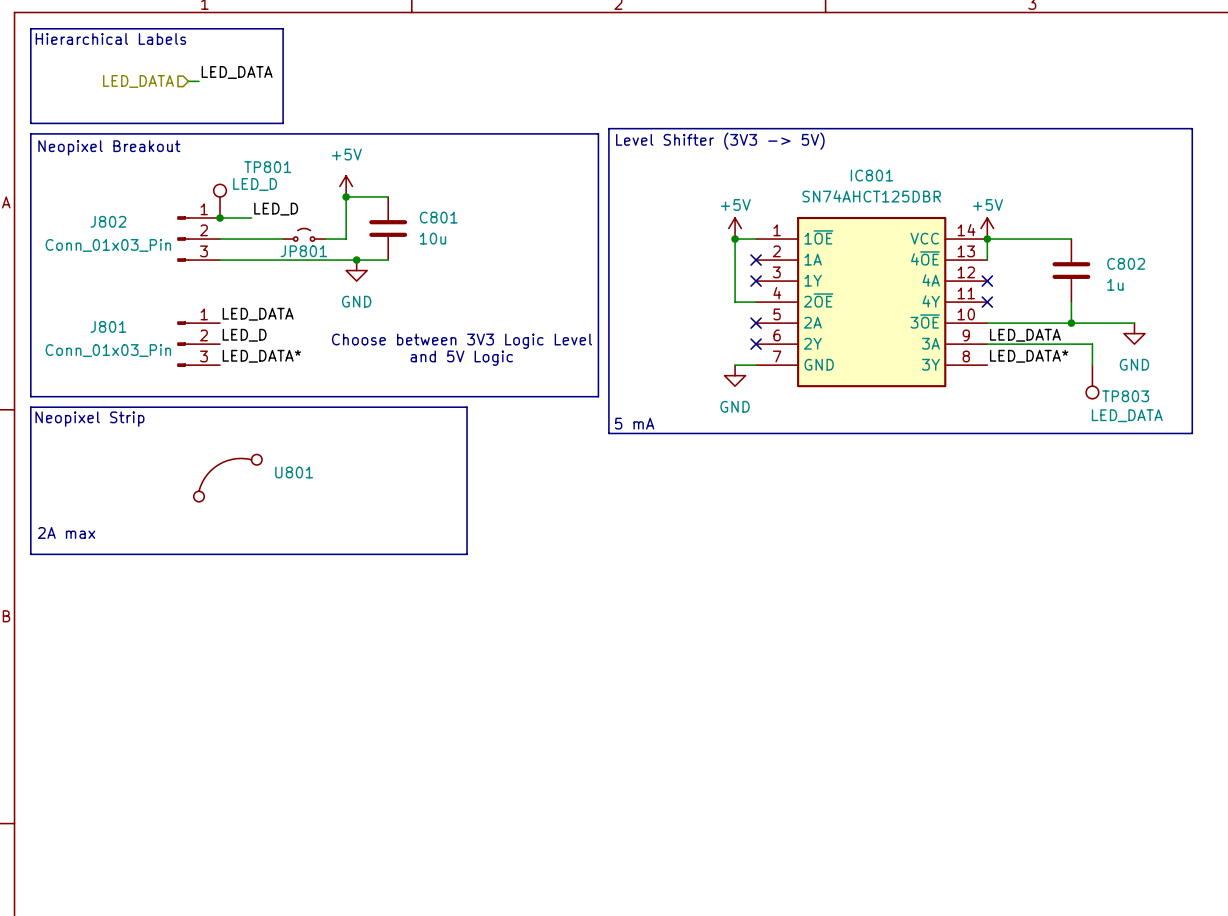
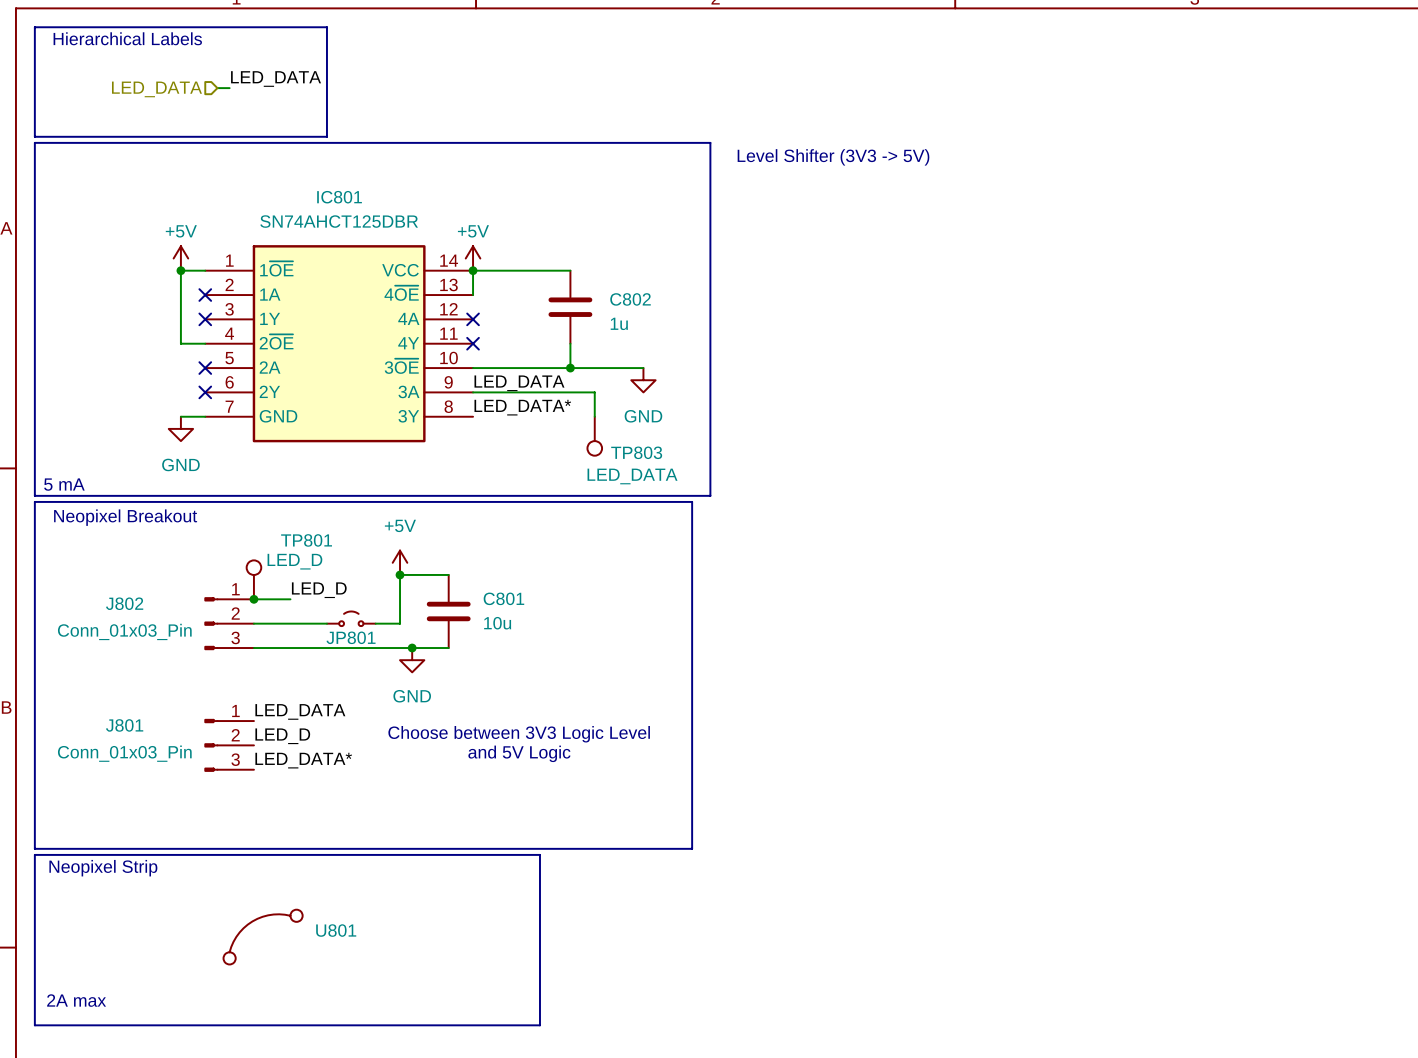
line: (608, 128) (608, 433) -> (704, 142) (34, 142) (34, 148)
line: (614, 128) (1192, 128) (1192, 433) (614, 433) -> (710, 142) (710, 495)
line: (30, 133) (598, 133) (598, 396) (30, 396) -> (34, 465) (34, 453)
text: Neopixel Breakout (109, 147) -> none
power symbol text position: +5V (346, 154) -> +5V (473, 231)
power symbol position: +5V (346, 186) -> +5V (473, 258)
junction: (346, 196) -> none
wire: (388, 196) (346, 196) (346, 239) (325, 239) -> none
TP801 position: (220, 201) -> (253, 579)
label: LED_D (276, 209) -> none
junction: (220, 218) -> none
power symbol: none -> +5V (180, 258)
C801 position: (388, 228) -> (448, 611)
power symbol: +5V (735, 228) -> none
power symbol: +5V (987, 228) -> none
JP801 position: (304, 234) -> (351, 618)
junction: none -> (180, 270)
wire: none -> (205, 270) (180, 270) (180, 343) (205, 343)
J802 position: (198, 239) -> (229, 623)
junction: none -> (473, 270)
wire: none -> (570, 270) (473, 270) (473, 295)
junction: (735, 239) -> none
wire: (756, 239) (735, 239) (735, 302) (756, 302) -> none
junction: (987, 239) -> none
wire: (1071, 239) (987, 239) (987, 260) -> none
no-connect mark: none -> (205, 295)
junction: (356, 260) -> none
no-connect mark: (756, 260) -> none
power symbol: GND (356, 270) -> none
C802 position: (1071, 270) -> (570, 307)
no-connect mark: none -> (205, 319)
no-connect mark: none -> (473, 319)
no-connect mark: (756, 281) -> none
no-connect mark: (987, 281) -> none
no-connect mark: none -> (473, 343)
wire: none -> (570, 343) (570, 368)
IC801 position: (871, 302) -> (339, 343)
no-connect mark: (987, 302) -> none
wire: (1071, 302) (1071, 323) -> none
label: LED_DATA (258, 314) -> none
no-connect mark: none -> (205, 368)
wire: none -> (473, 368) (643, 368)
junction: none -> (570, 368)
no-connect mark: (756, 323) -> none
wire: (987, 323) (1134, 323) -> none
junction: (1071, 323) -> none
power symbol: none -> GND (643, 380)
power symbol: GND (1134, 333) -> none
label: LED_D (244, 335) -> none
label: none -> LED_DATA (519, 383)
label: LED_DATA (1025, 335) -> none
text: Choose between 3V3 Logic Level (462, 341) -> none
no-connect mark: none -> (205, 392)
J801 position: (198, 344) -> (229, 745)
wire: none -> (473, 392) (594, 392) (594, 416)
no-connect mark: (756, 344) -> none
wire: (987, 344) (1092, 344) (1092, 365) -> none
label: LED_DATA* (261, 356) -> none
label: none -> LED_DATA* (522, 407)
label: LED_DATA* (1029, 356) -> none
text: and 5V Logic (461, 358) -> none
wire: none -> (180, 416) (205, 416)
wire: (735, 365) (756, 365) -> none
power symbol: none -> GND (180, 428)
power symbol: GND (735, 375) -> none
TP803 position: (1092, 381) -> (594, 436)
line: (30, 407) (467, 407) (467, 554) (30, 554) -> (34, 501) (692, 501) (692, 848) (34, 848) (34, 635)
text: Neopixel Strip (89, 419) -> none
text: none -> 5 mA (64, 484)
text: 5 mA (634, 423) -> none
line: (30, 433) (30, 438) -> (34, 495) (704, 495)
text: none -> Neopixel Breakout (125, 517)
U801 position: (227, 478) -> (263, 937)
power symbol: none -> +5V (400, 562)
junction: none -> (400, 574)
wire: none -> (448, 574) (400, 574) (400, 623) (375, 623)
label: none -> LED_D (319, 590)
wire: none -> (253, 599) (290, 599)
junction: none -> (253, 599)
text: 2A max (66, 532) -> none
wire: none -> (253, 623) (326, 623)
wire: none -> (253, 648) (448, 648)
junction: none -> (412, 648)
power symbol: none -> GND (412, 660)
label: none -> LED_DATA (300, 711)
text: none -> Choose between 3V3 Logic Level (519, 734)
label: none -> LED_D (282, 736)
text: none -> and 5V Logic (519, 753)
label: none -> LED_DATA* (303, 760)
line: none -> (34, 854) (539, 854) (539, 1025) (34, 1025) (34, 854)
text: none -> Neopixel Strip (103, 868)
text: none -> 2A max (76, 1000)

